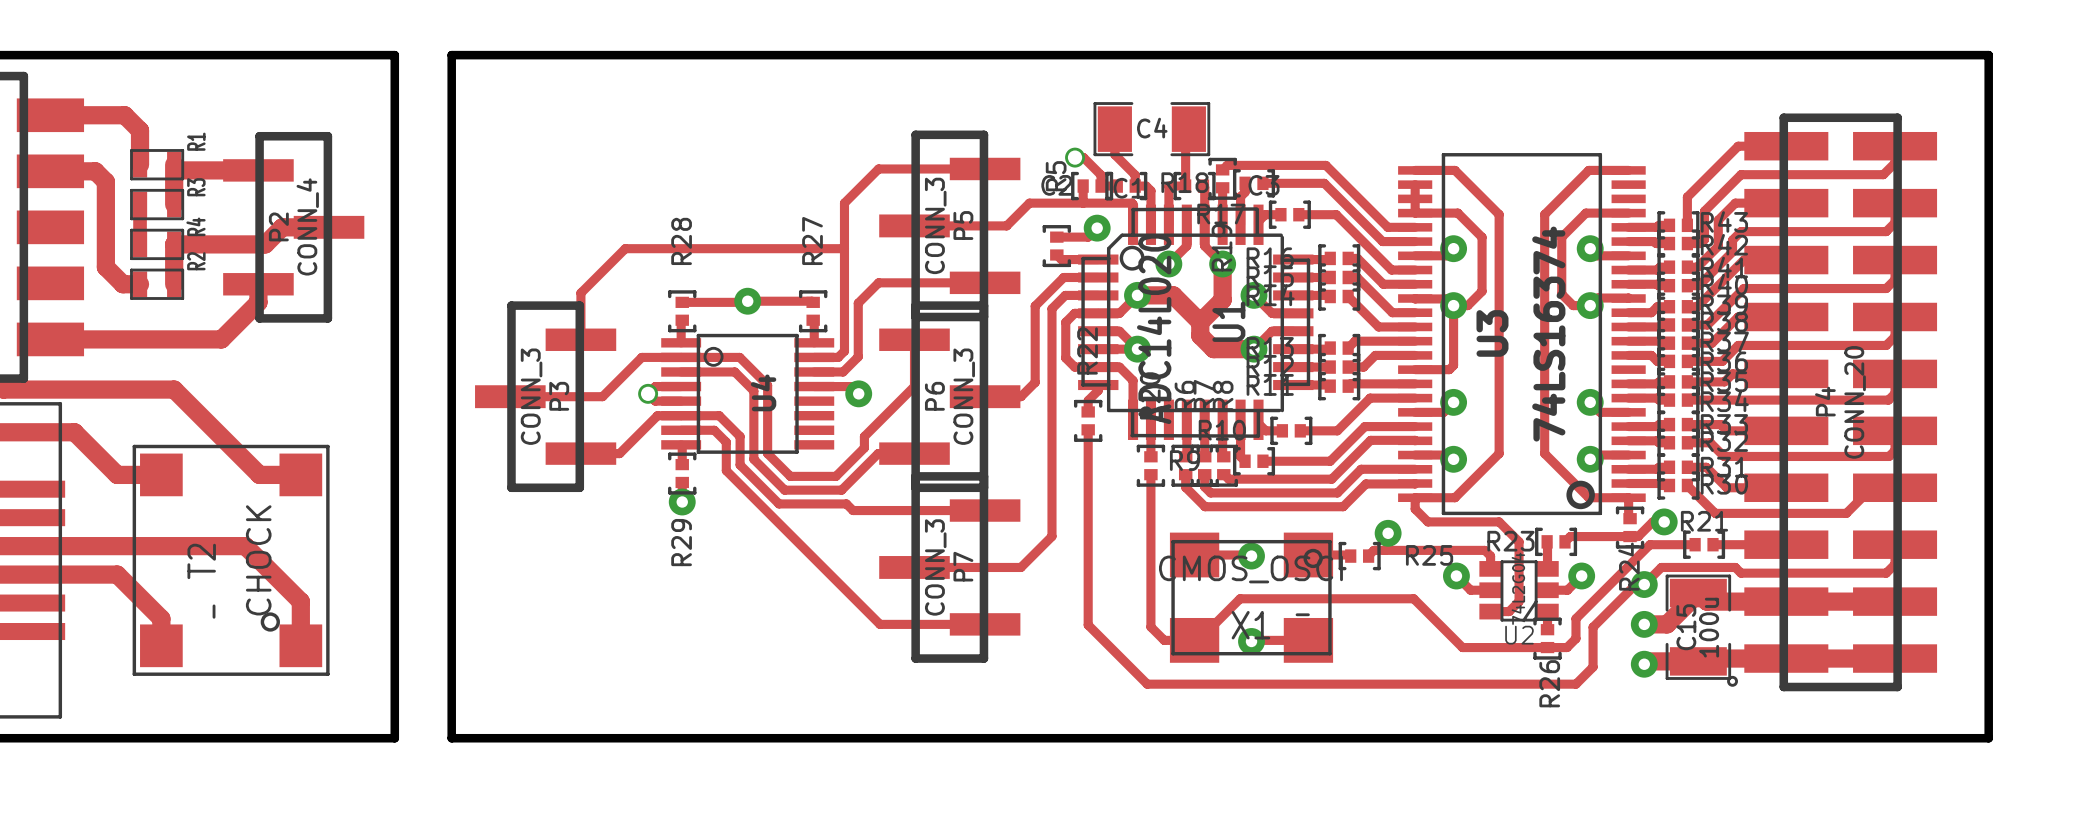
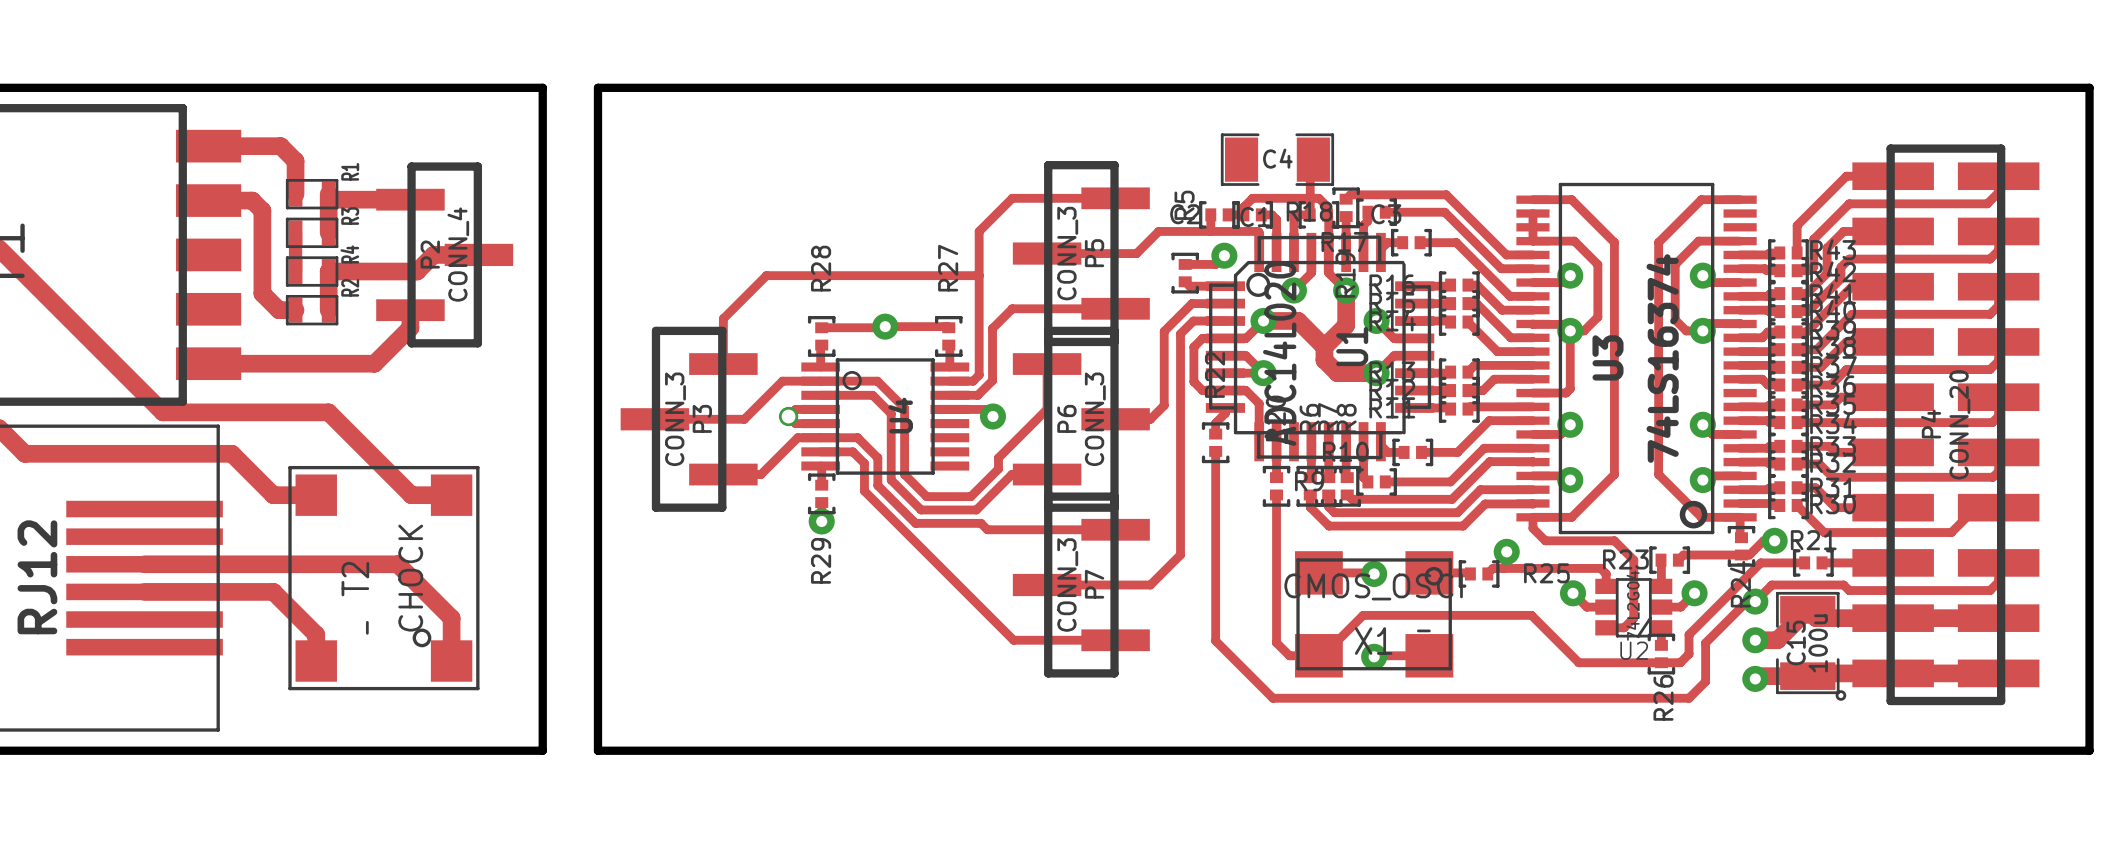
track: (1114, 129) (1114, 154) (1135, 175) (1135, 186) -> none
track: (1075, 157) (1083, 157) (1101, 175) (1101, 186) -> none
via: (1075, 157) -> none
track: none -> (1243, 214) (1243, 206) (1252, 198) (1318, 198) (1327, 206) (1327, 214)

